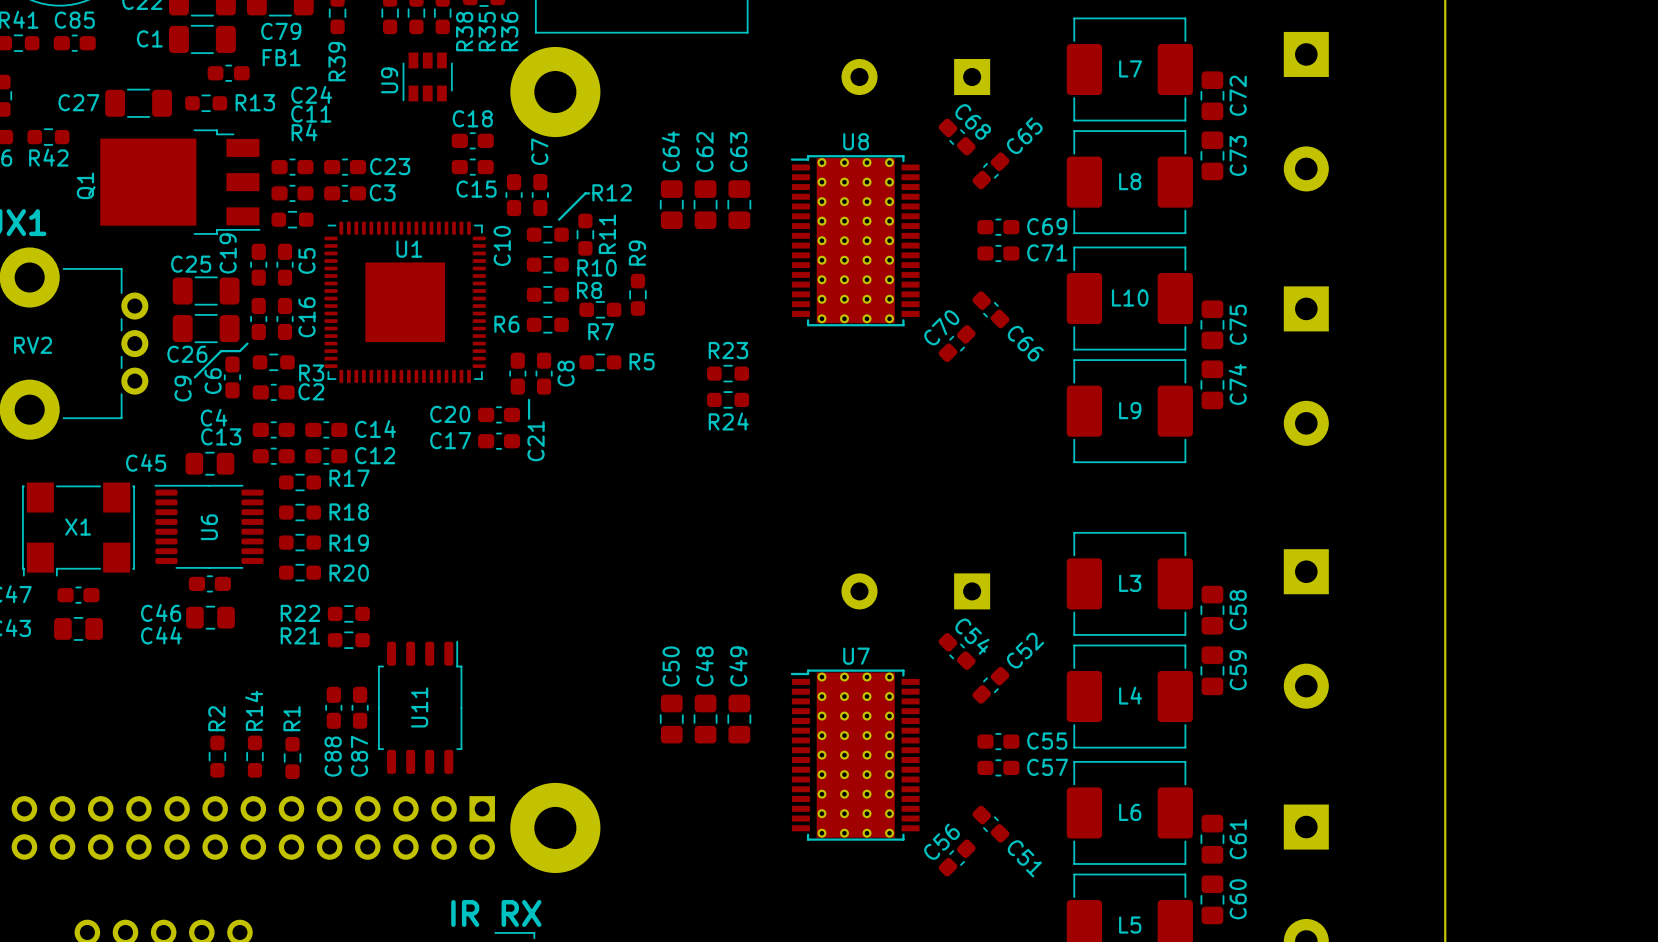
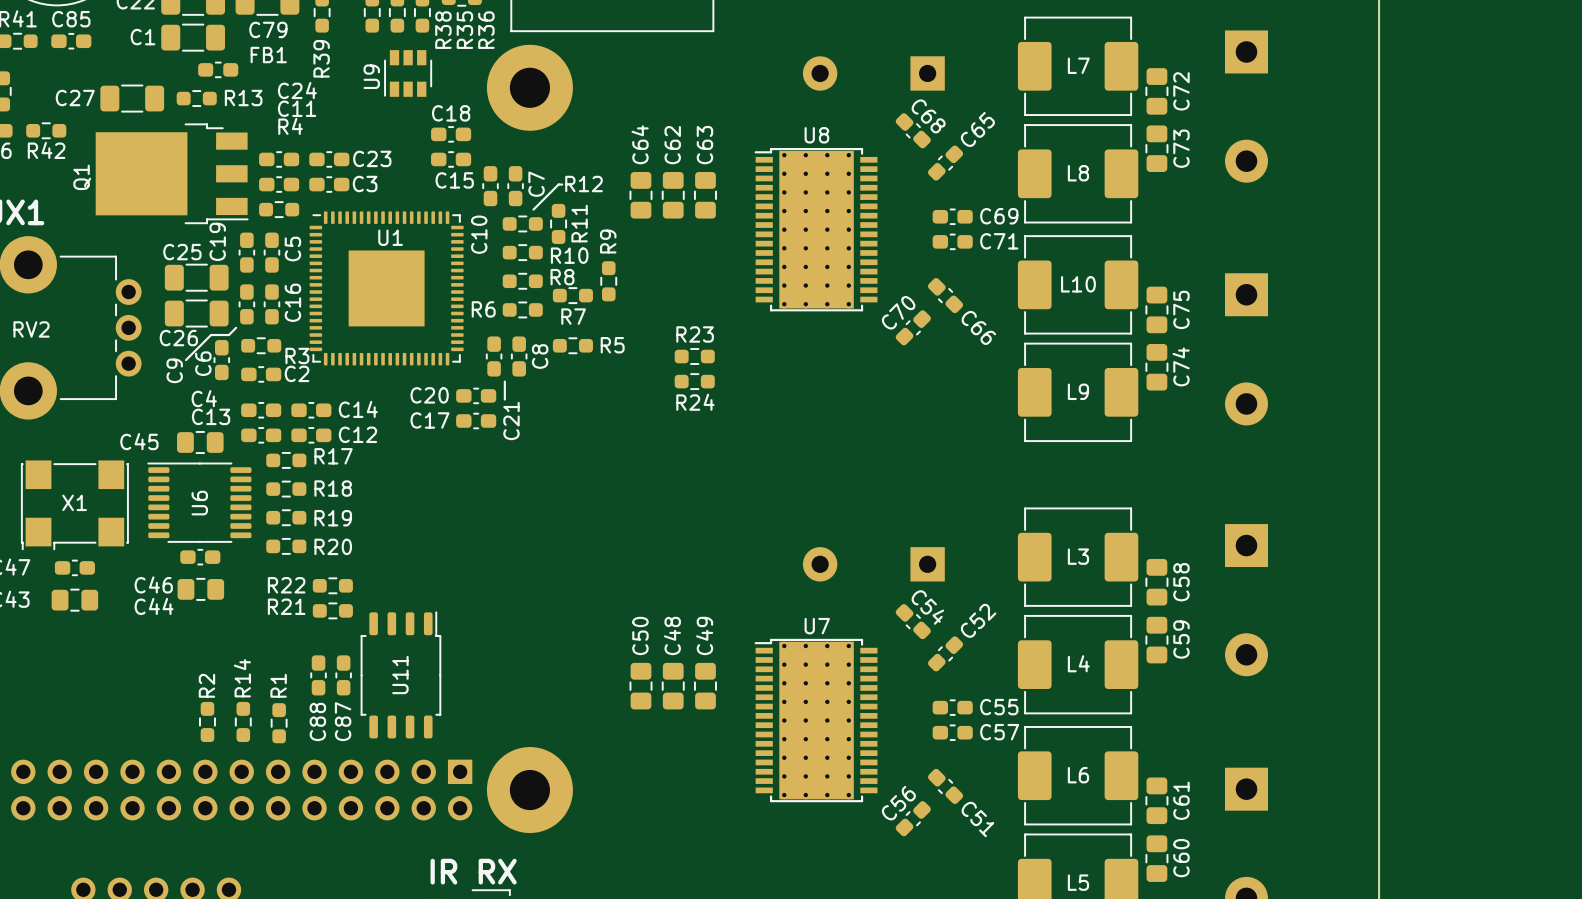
C7 name position: C7 (539, 151) -> C7 (536, 184)

